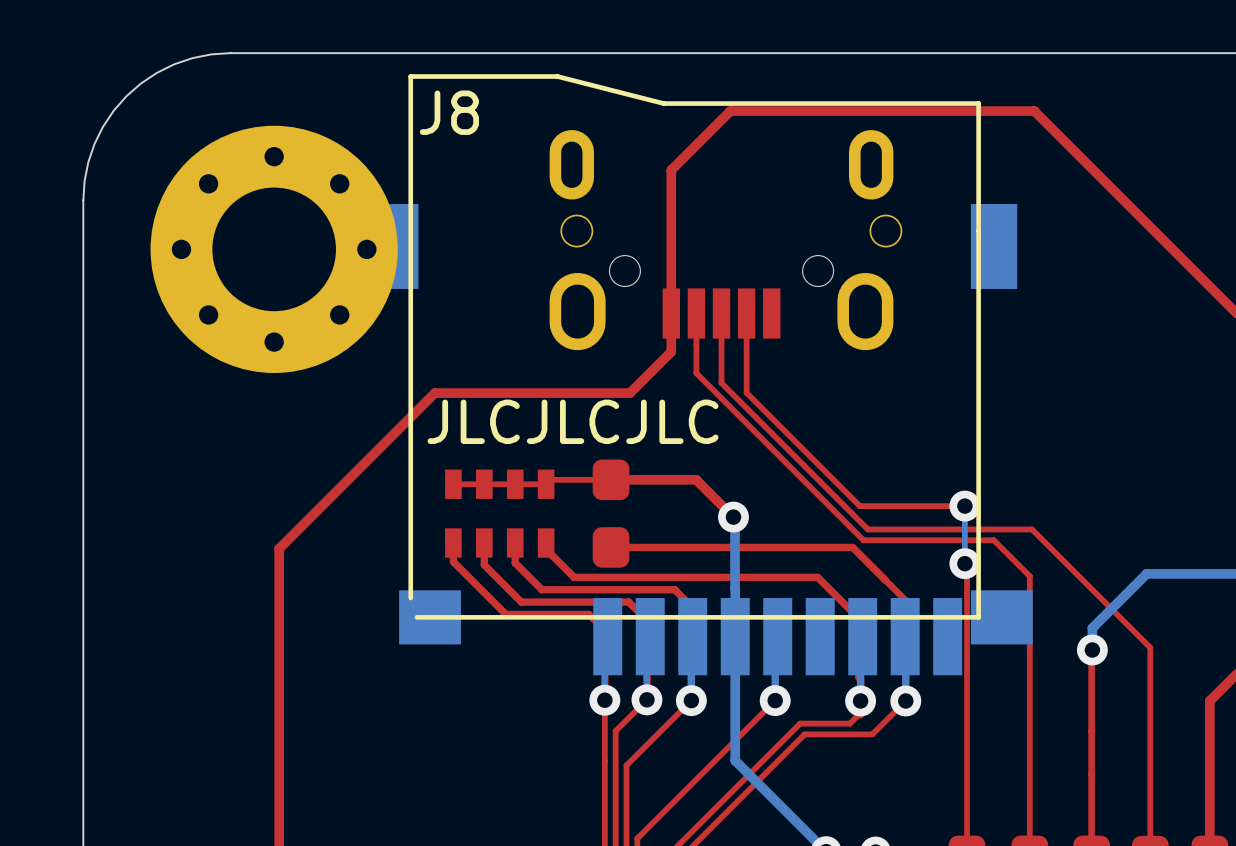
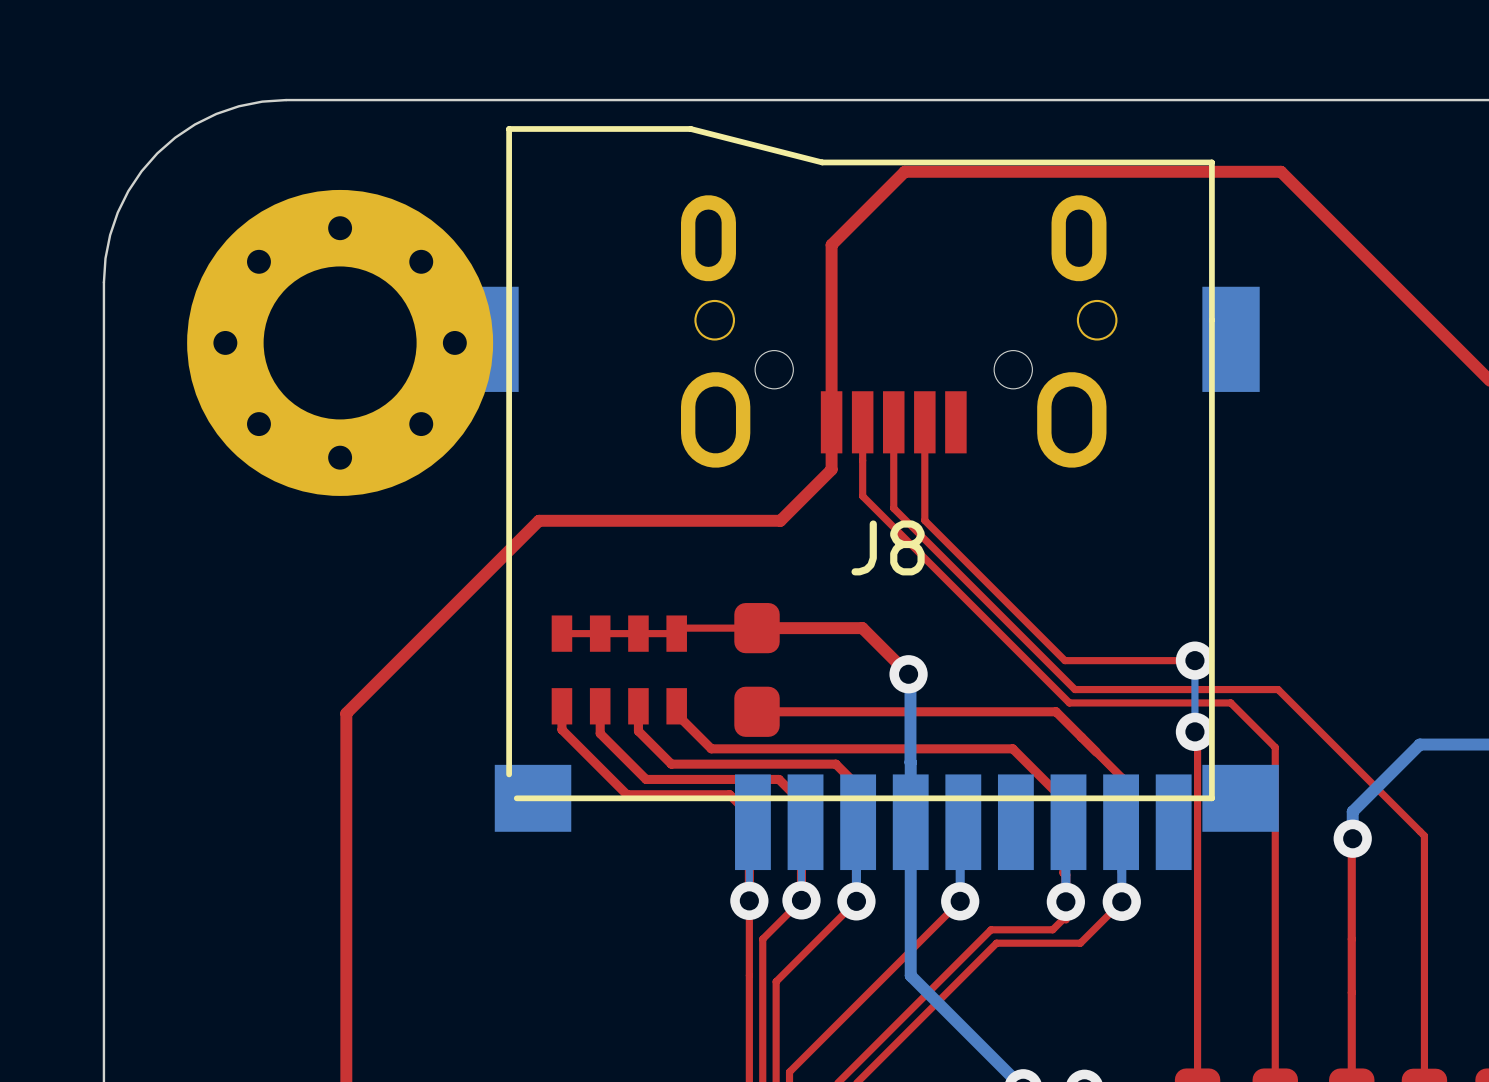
J8 name position: J8 (449, 112) -> J8 (888, 547)
text: JLCJLCJLC (573, 421) -> none

